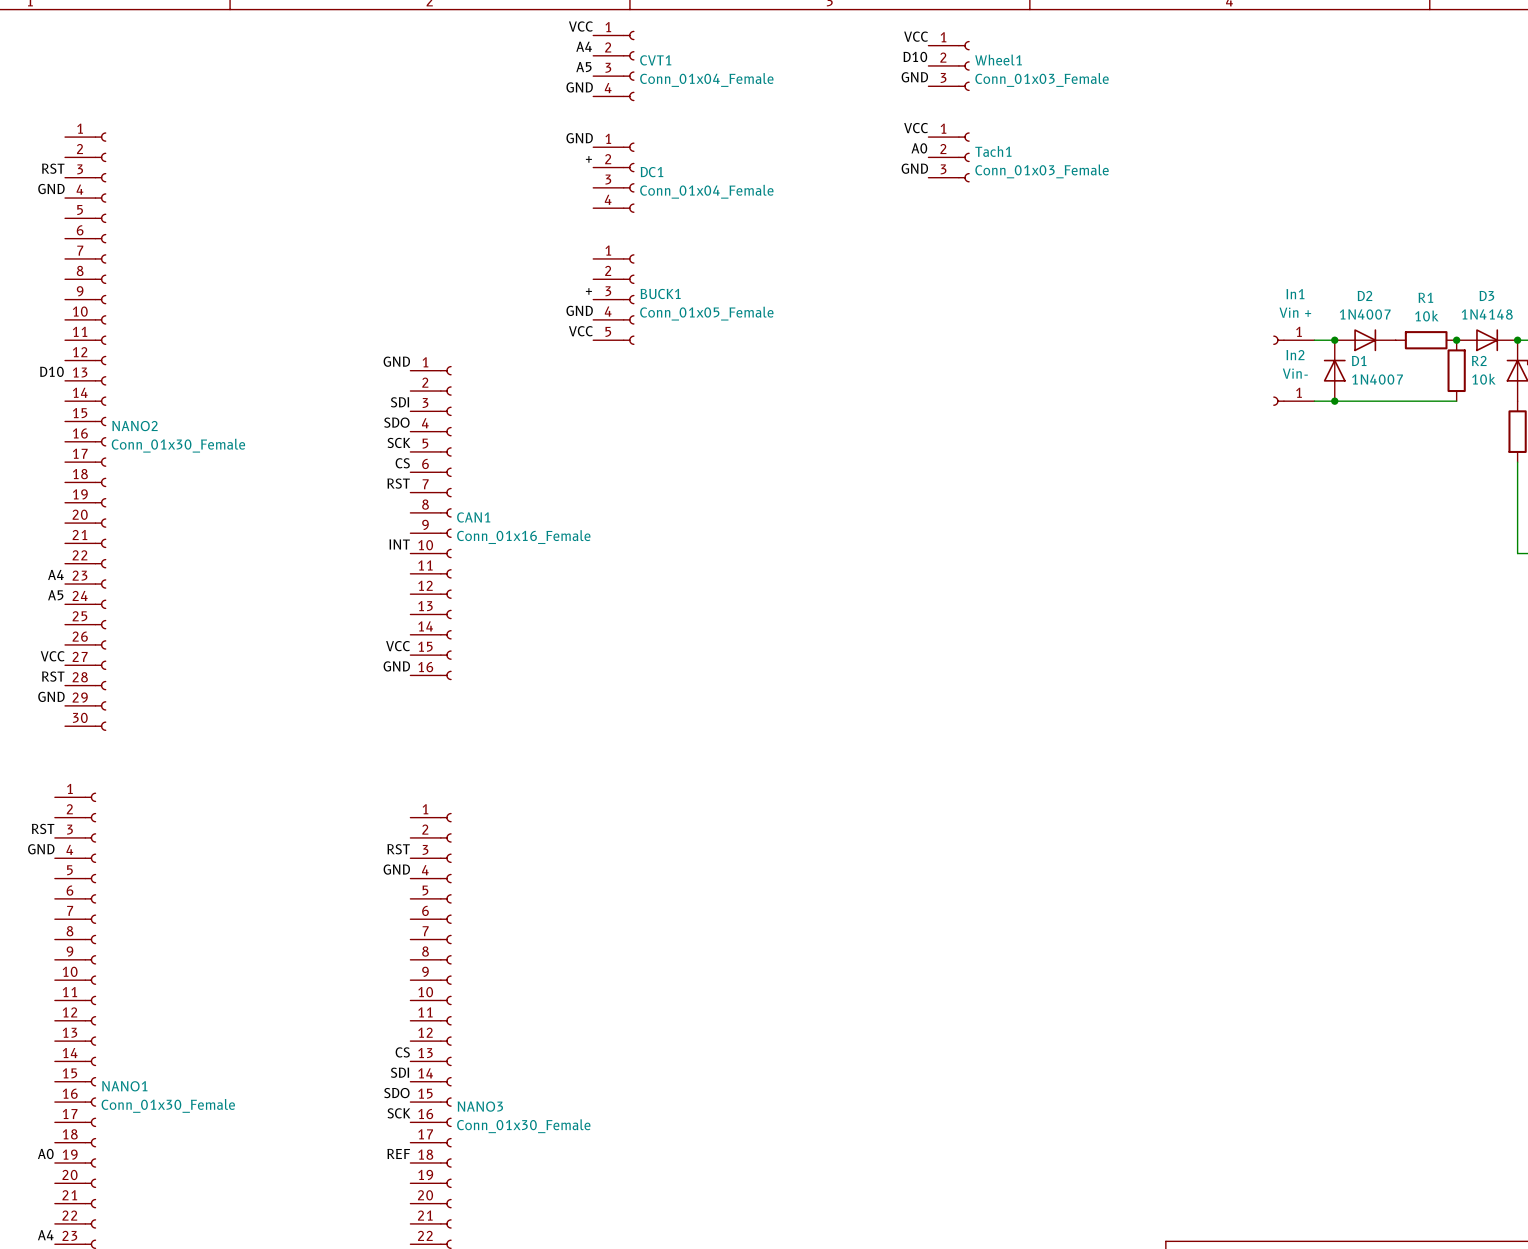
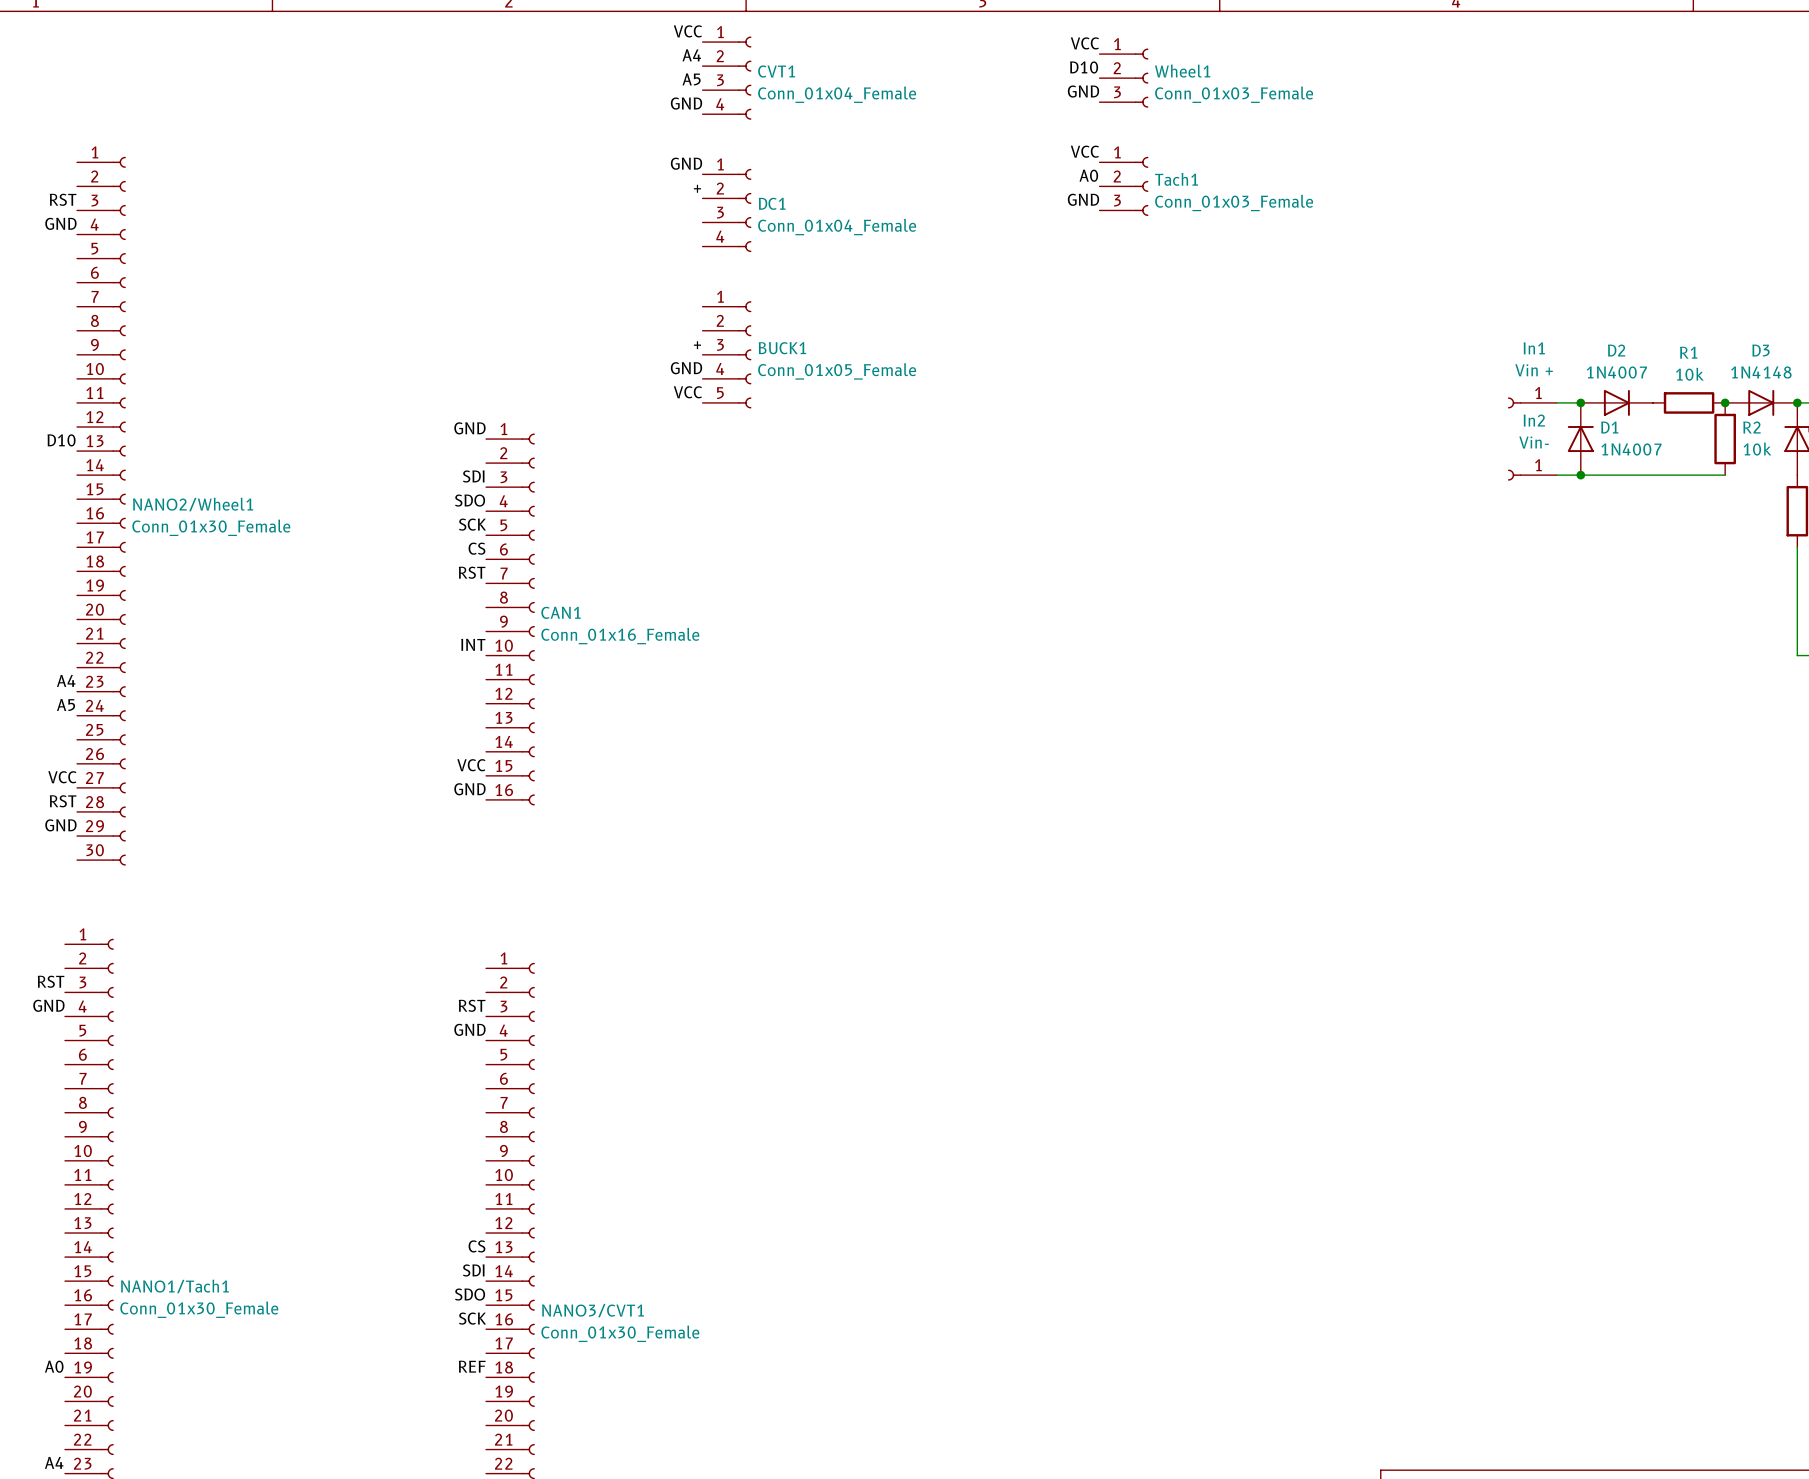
NANO2 name: NANO2 (134, 426) -> NANO2/Wheel1 (193, 504)
NANO1 name: NANO1 (124, 1086) -> NANO1/Tach1 (174, 1286)
NANO3 name: NANO3 (480, 1106) -> NANO3/CVT1 (593, 1310)

